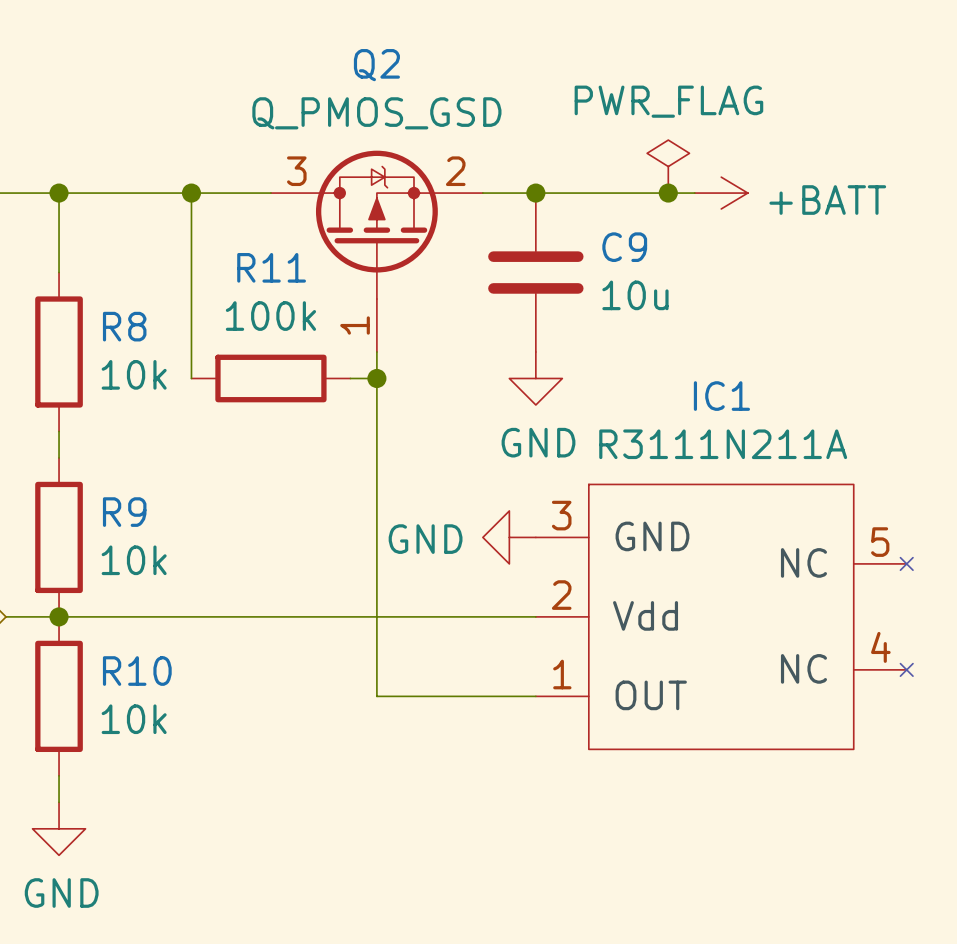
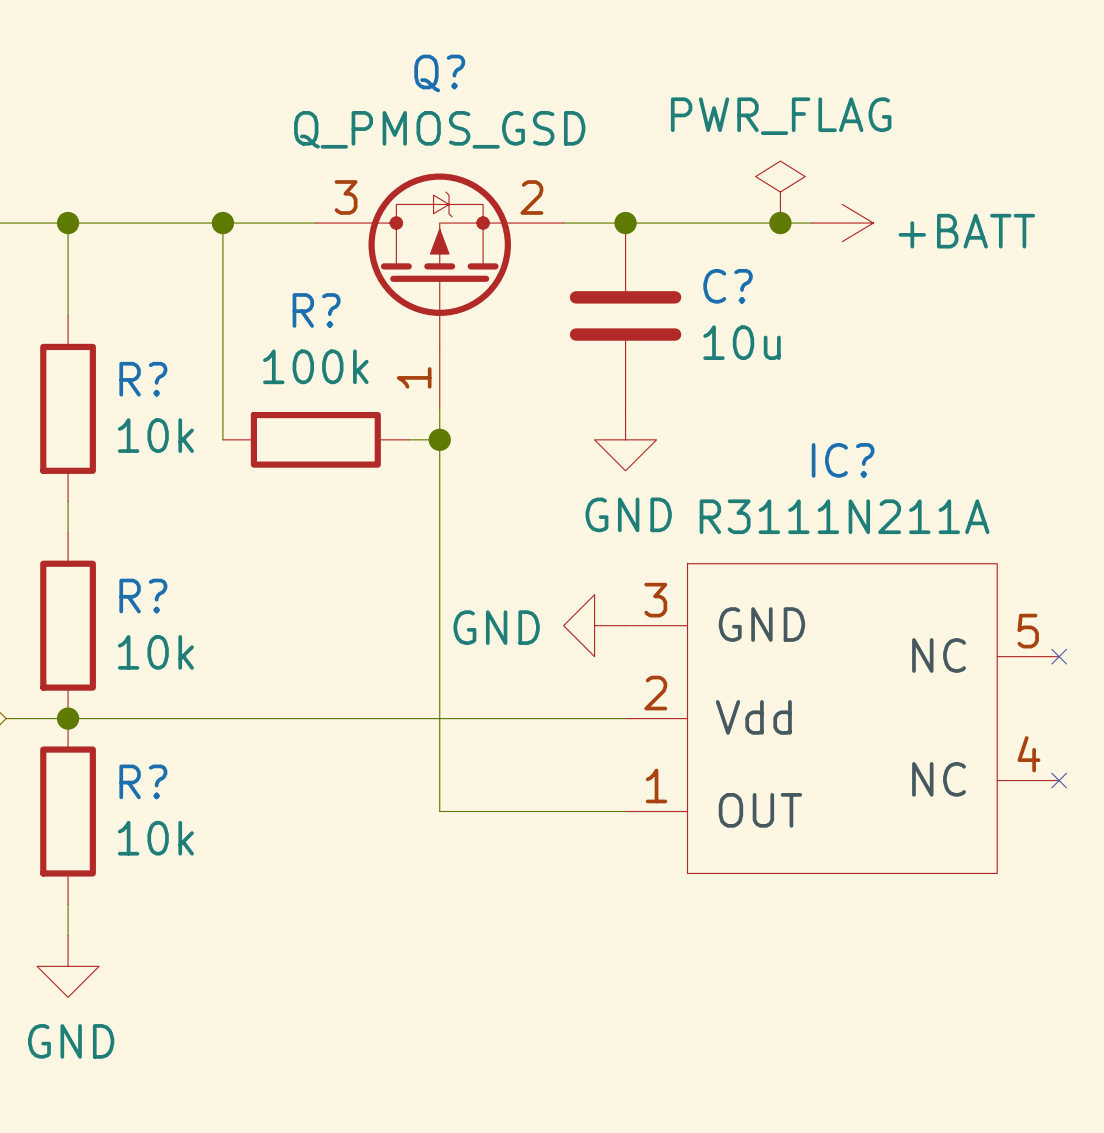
Q2 name: Q2 (376, 65) -> Q? (439, 73)
C9 name: C9 (624, 247) -> C? (728, 286)
R11 name: R11 (271, 267) -> R? (316, 310)
R8 name: R8 (124, 326) -> R? (143, 379)
IC1 name: IC1 (721, 396) -> IC? (843, 460)
R9 name: R9 (124, 512) -> R? (143, 596)
R10 name: R10 (137, 671) -> R? (143, 781)

